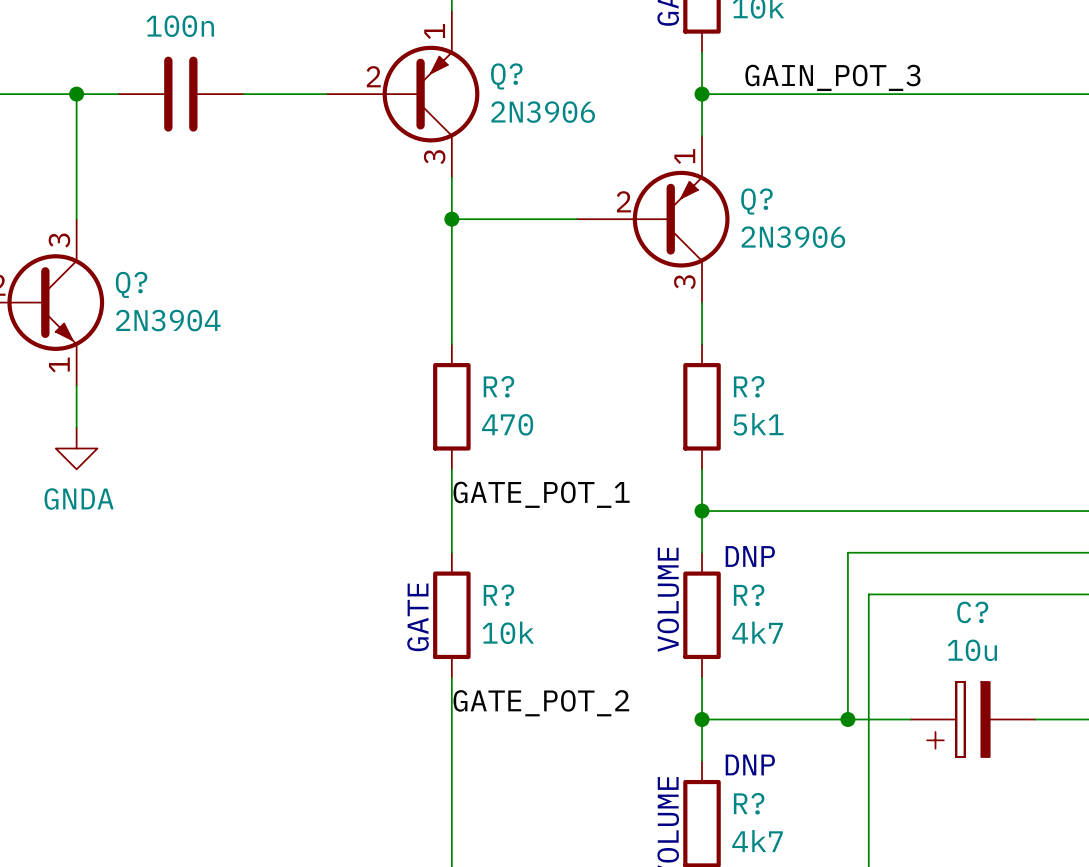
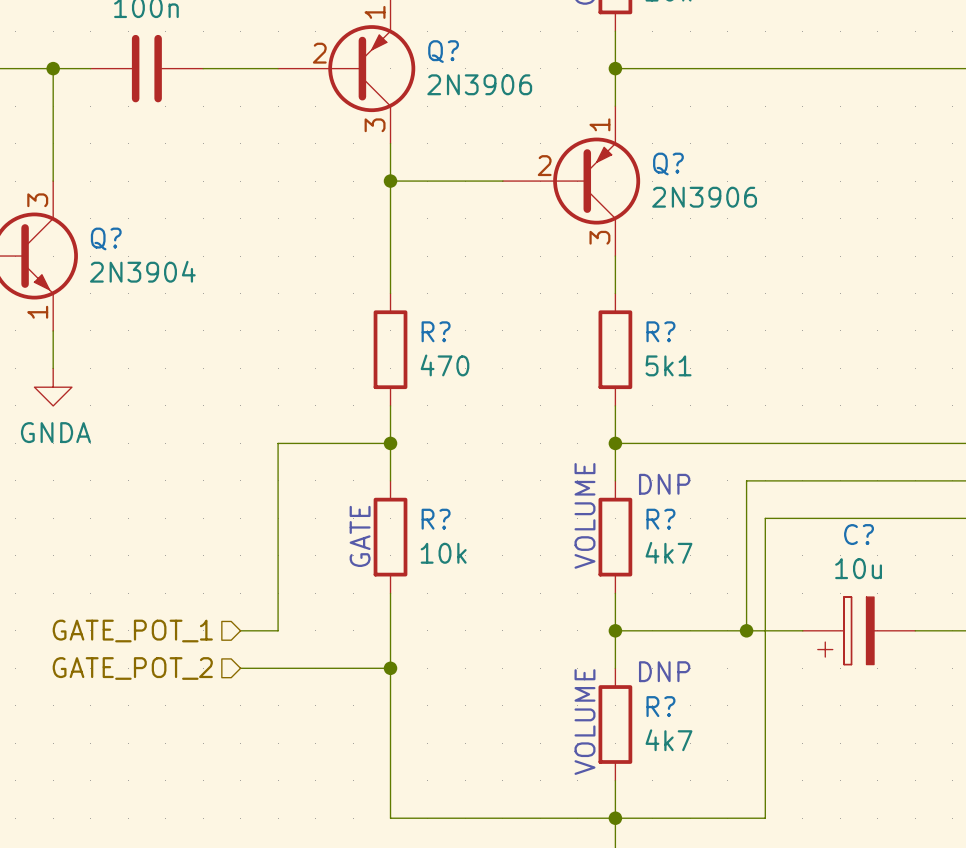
label: GAIN_POT_3 (832, 77) -> none
label: GATE_POT_1 (541, 494) -> none
wire: none -> (390, 443) (278, 443) (278, 630) (240, 630)
junction: none -> (390, 443)
label: GATE_POT_2 (541, 703) -> none
hierarchical label: none -> GATE_POT_1 (132, 631)
wire: none -> (240, 668) (390, 668)
junction: none -> (390, 668)
hierarchical label: none -> GATE_POT_2 (132, 668)

